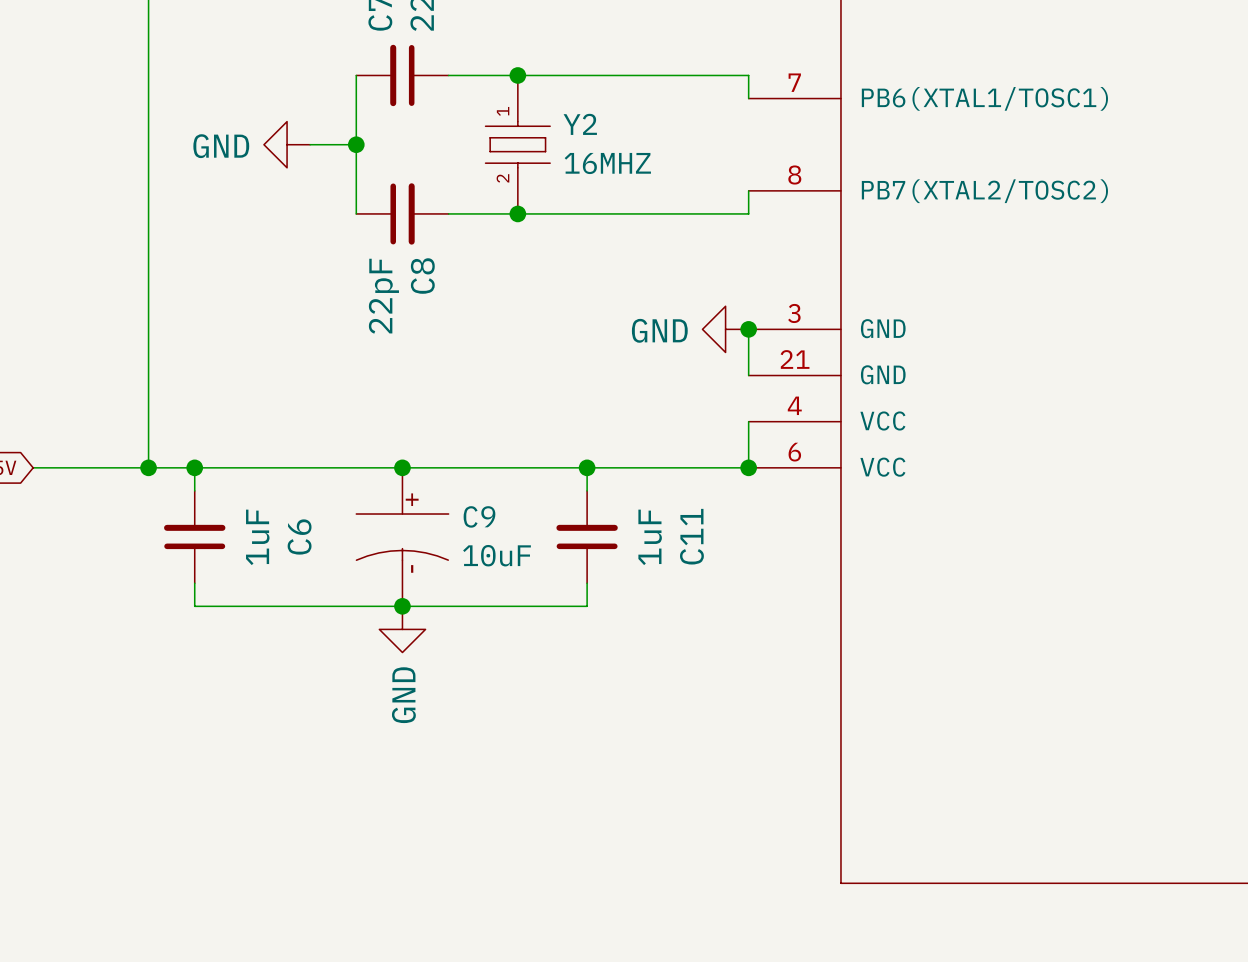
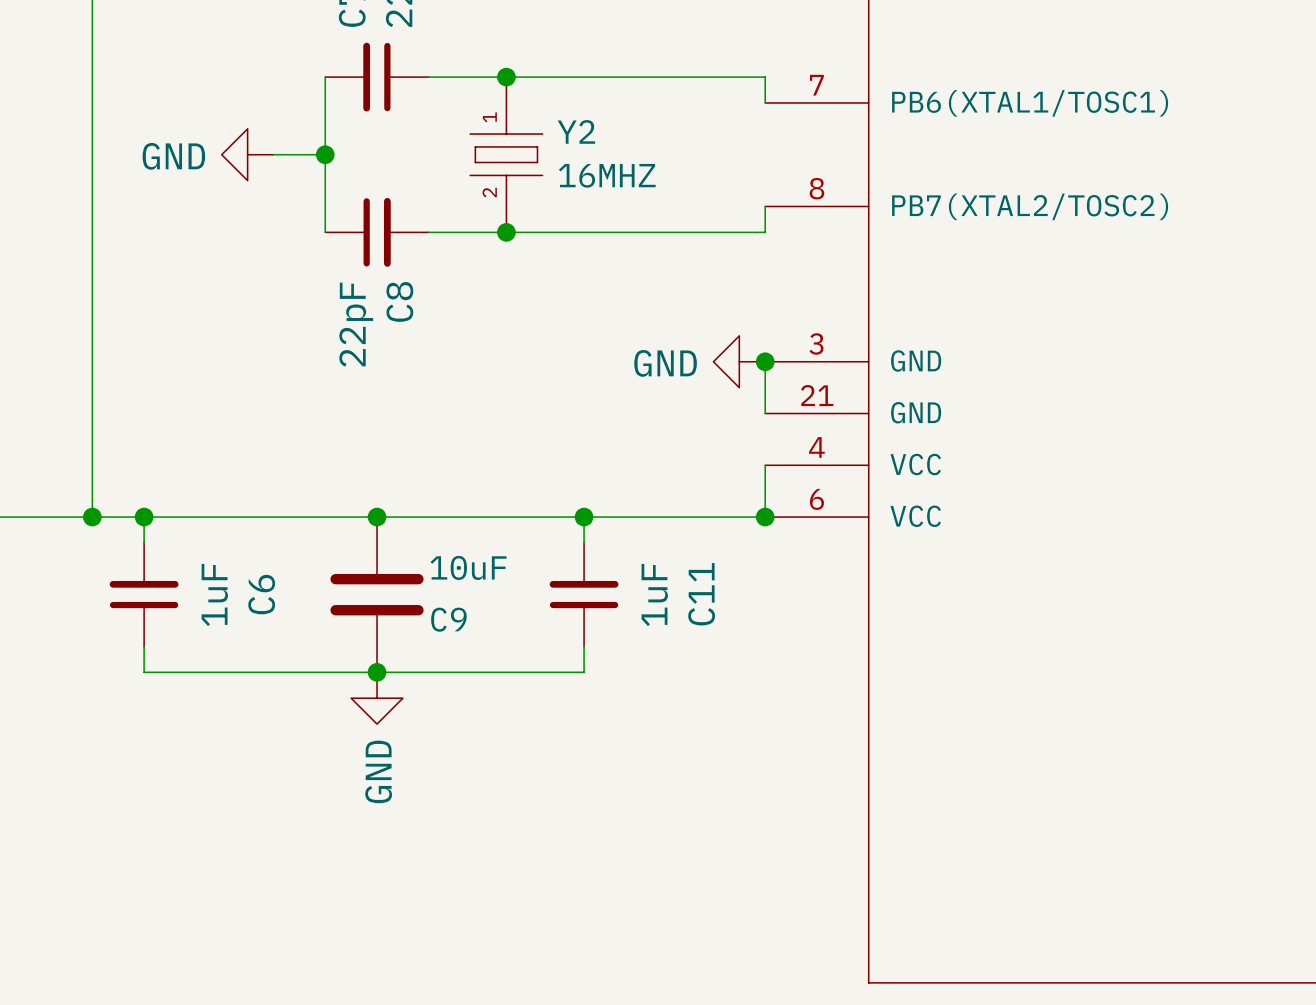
C9 symbol: [356, 467, 449, 607] -> [330, 517, 424, 673]
C9 name position: C9 (479, 516) -> C9 (448, 619)
C9 value position: 10uF (497, 555) -> 10uF (468, 567)

